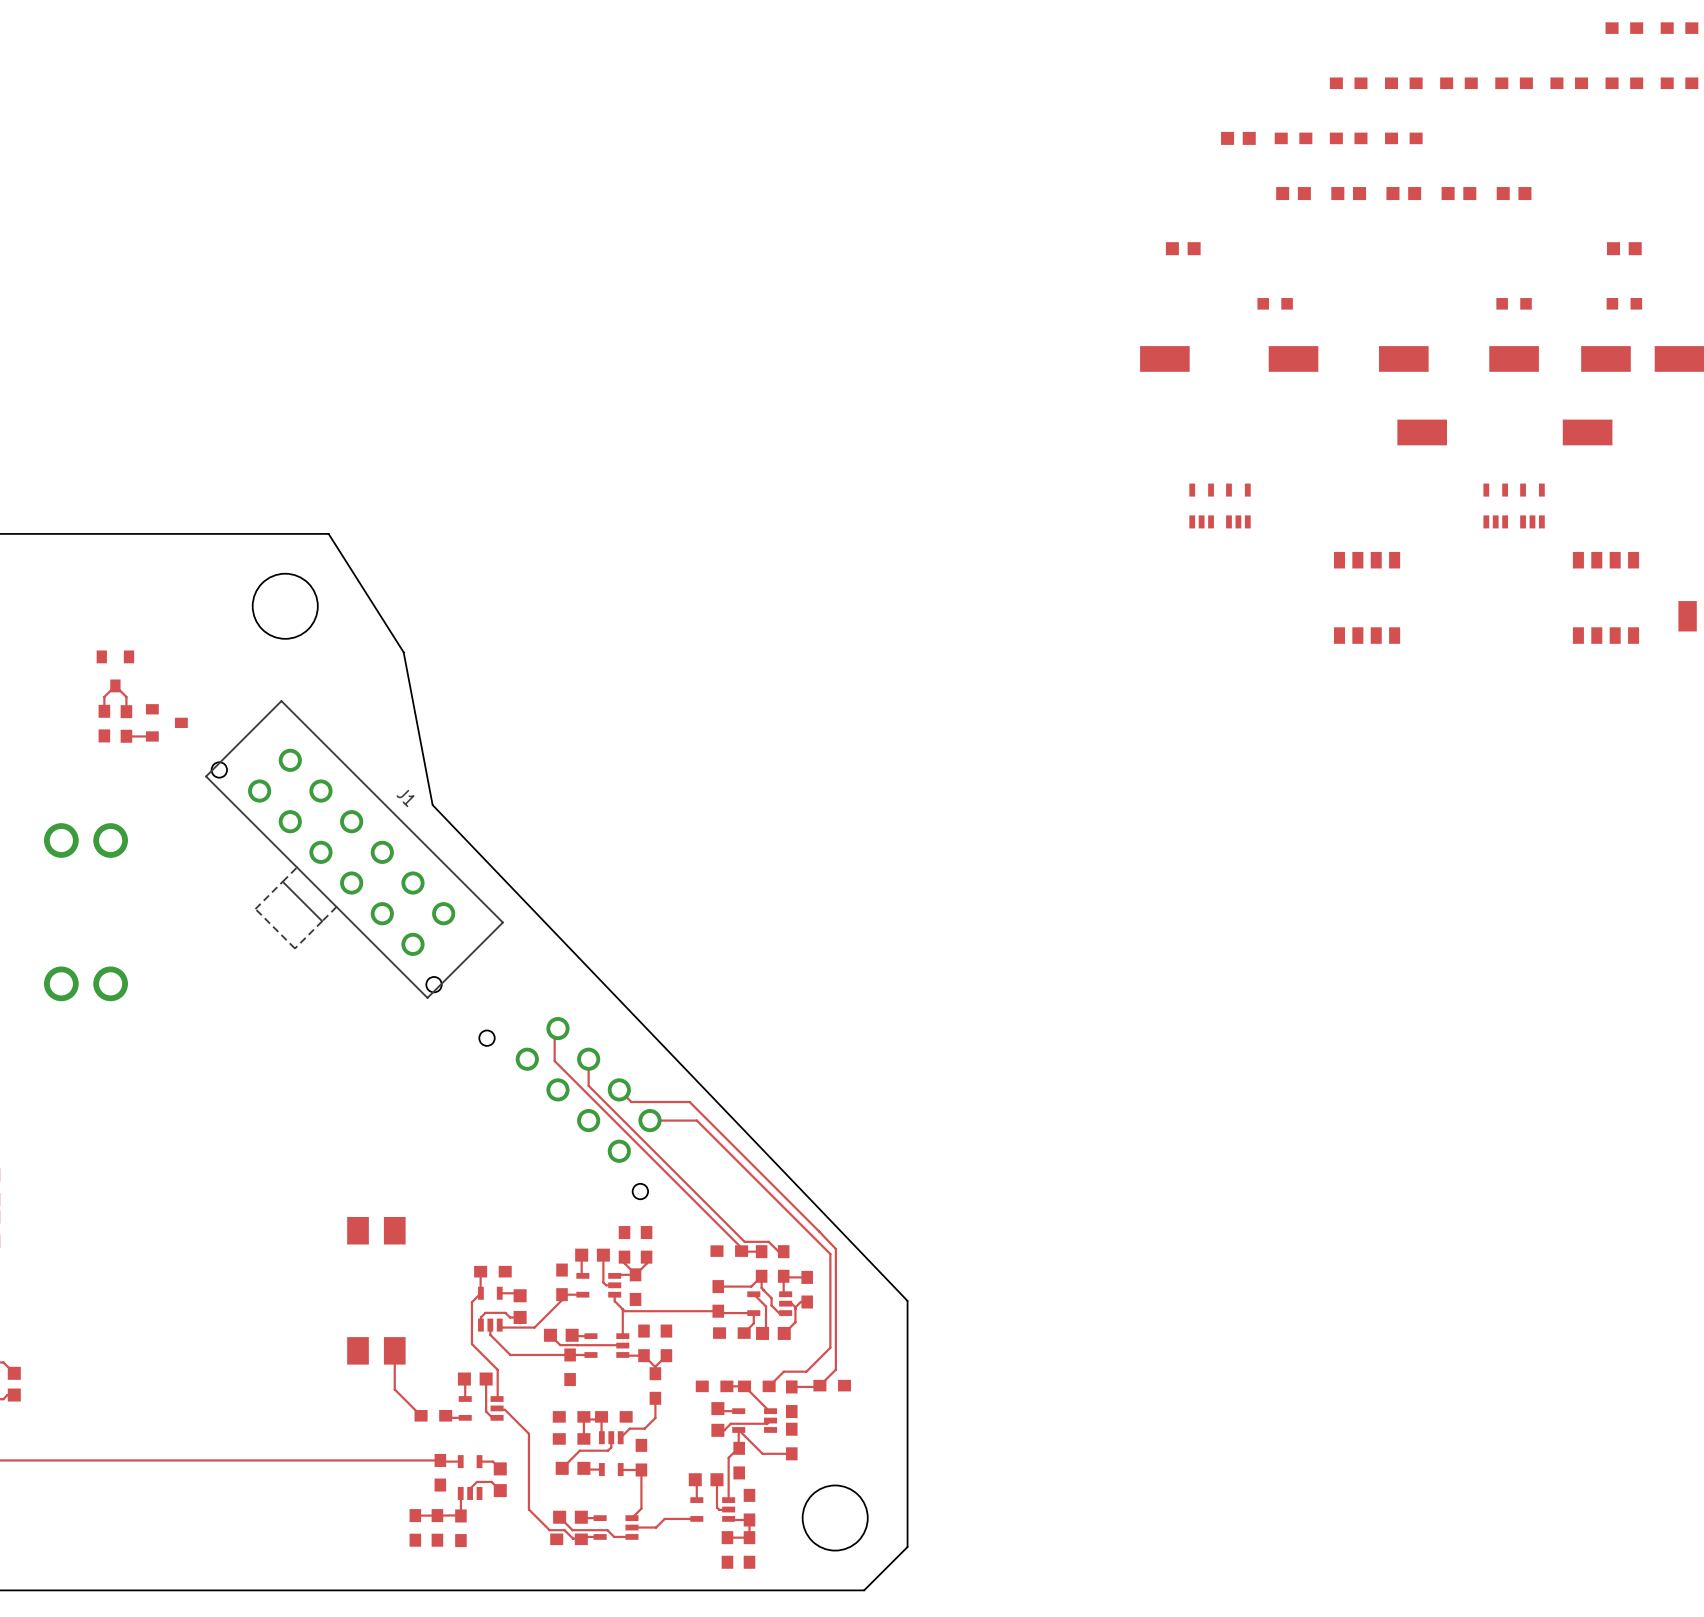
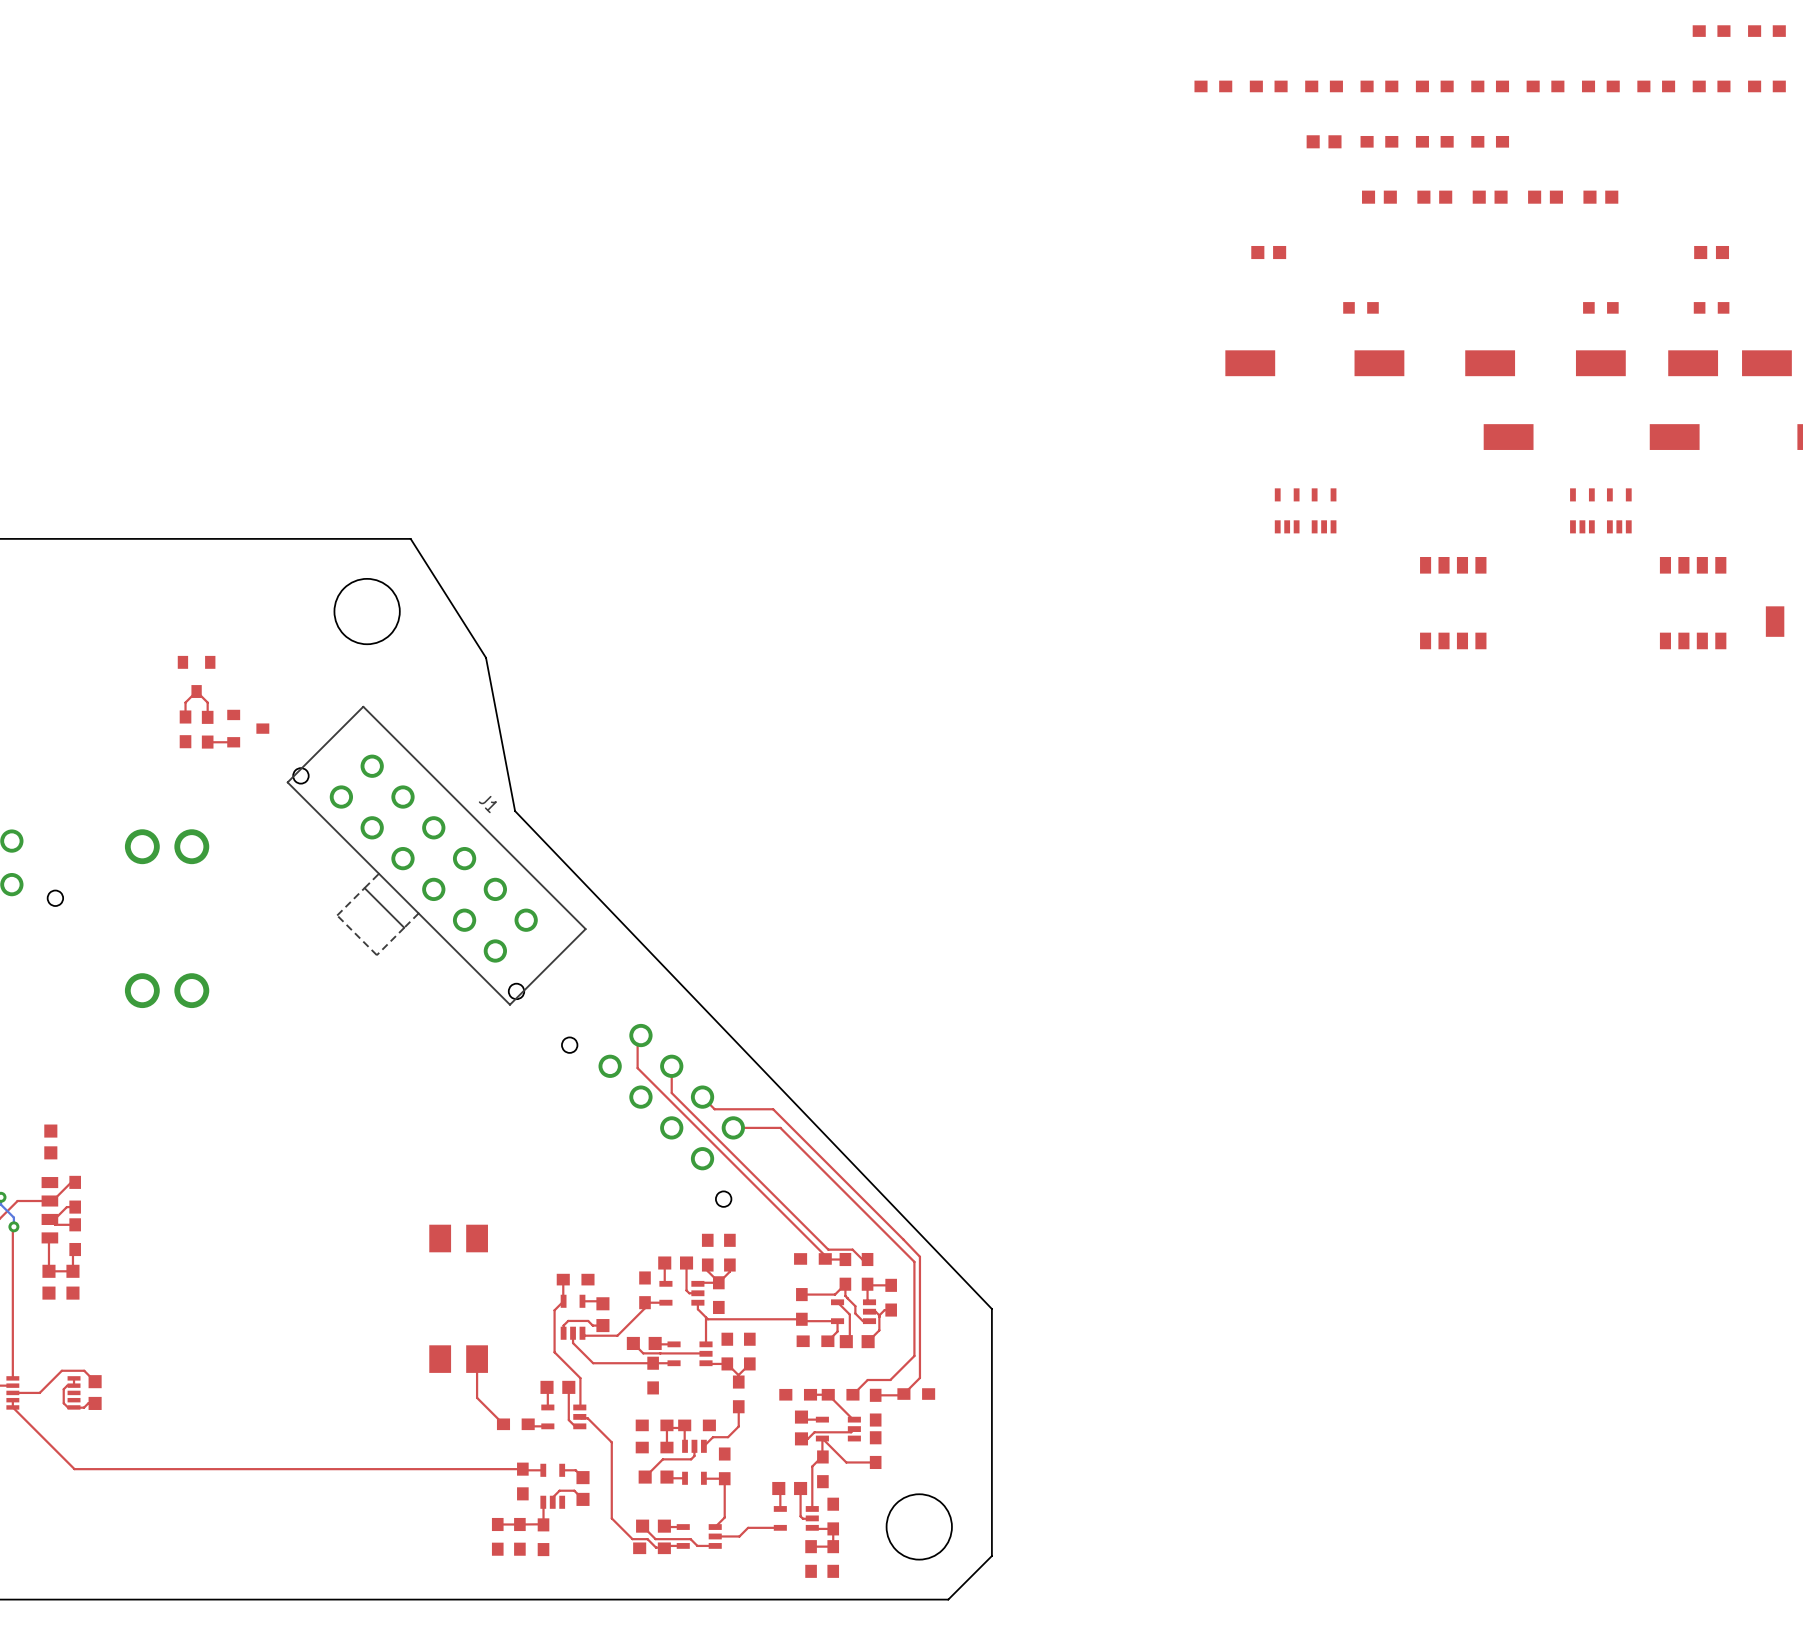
part: none -> (1213, 86)
part: none -> (1268, 86)
part: none -> (1324, 86)
part: none -> (1379, 86)

